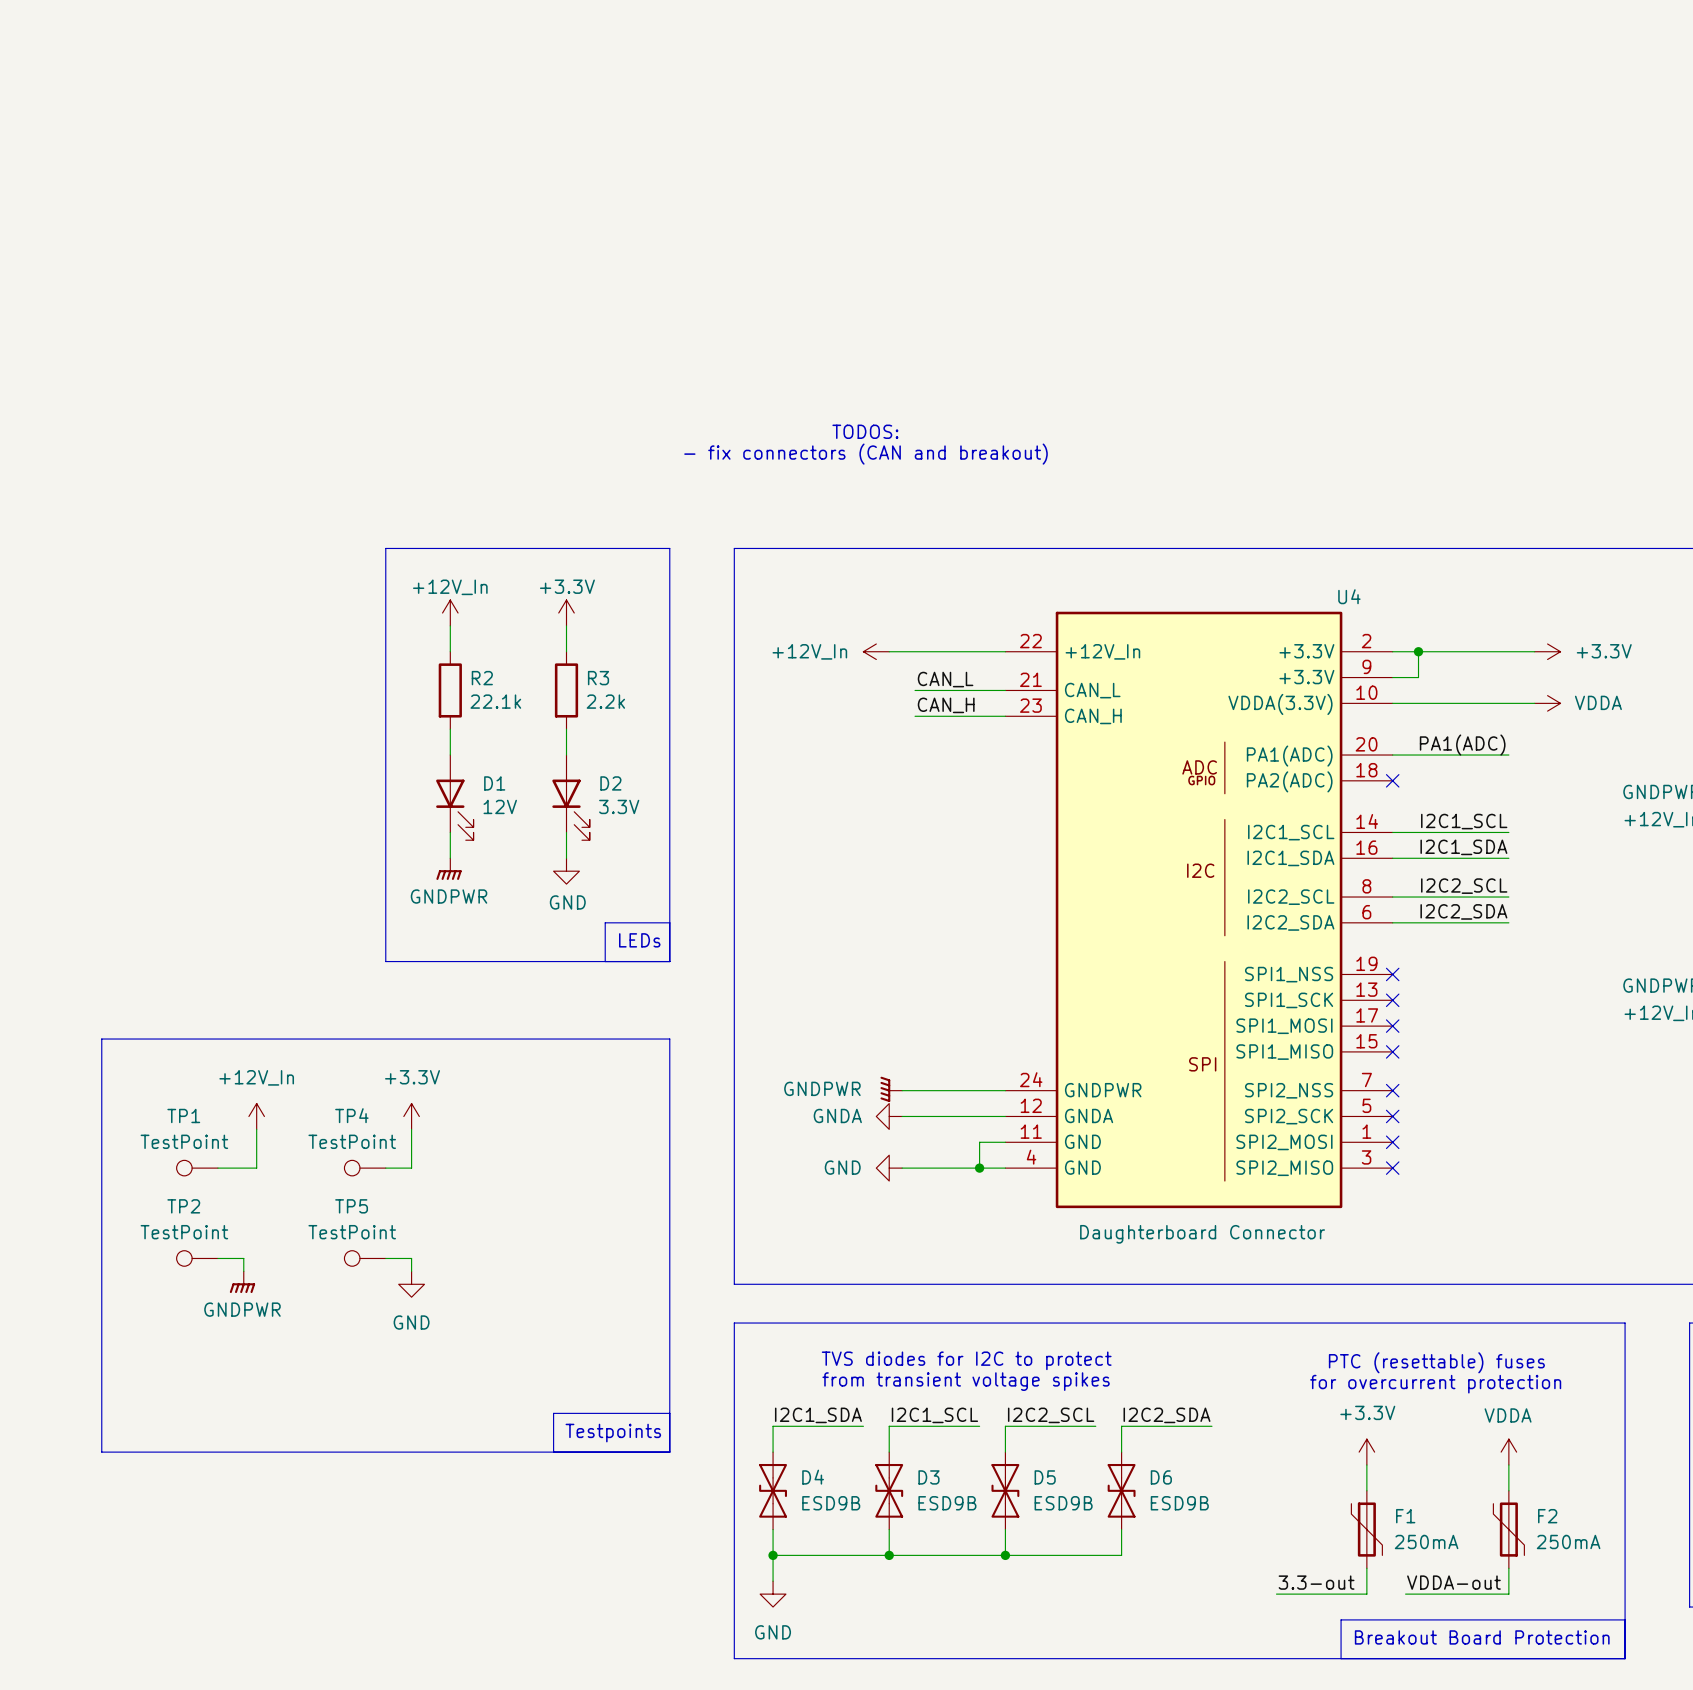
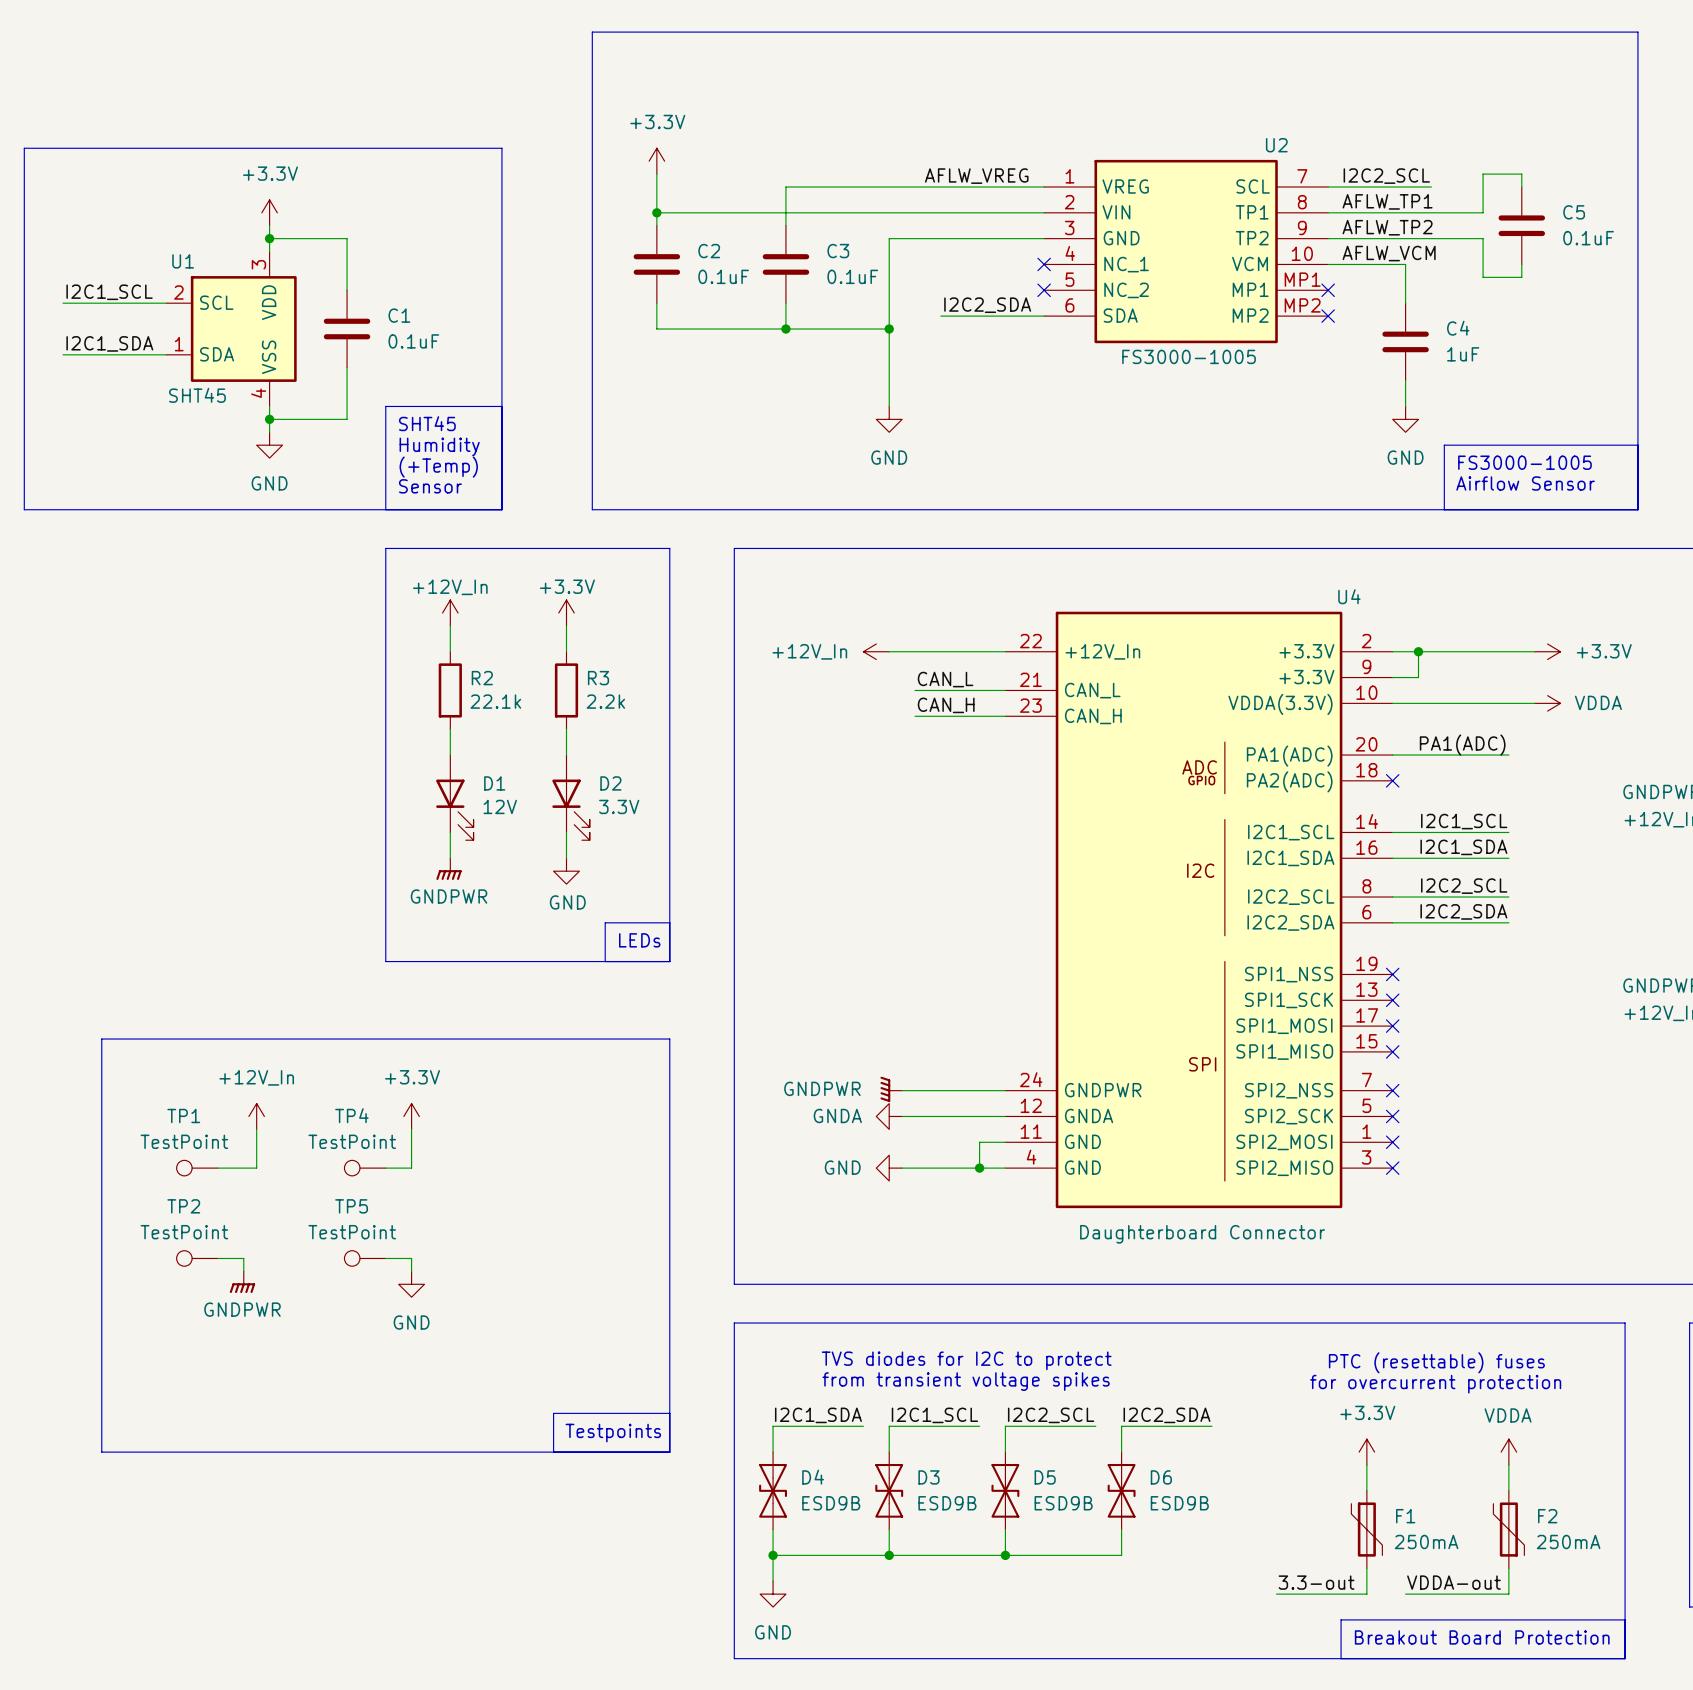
line: none -> (592, 32) (1637, 32) (1637, 509) (592, 509) (592, 32)
line: none -> (24, 148) (501, 148) (501, 509) (24, 509) (24, 148)
power symbol: none -> +3.3V (656, 161)
wire: none -> (656, 174) (656, 225)
label: none -> AFLW_VREG (976, 176)
label: none -> I2C2_SCL (1386, 176)
wire: none -> (1044, 187) (785, 187) (785, 225)
wire: none -> (1328, 187) (1431, 187)
wire: none -> (1521, 187) (1521, 174) (1483, 174) (1483, 212) (1328, 212)
label: none -> AFLW_TP1 (1387, 201)
power symbol: none -> +3.3V (269, 212)
wire: none -> (656, 212) (1044, 212)
junction: none -> (656, 212)
wire: none -> (269, 225) (269, 251)
C5: none -> 0.1uF (1521, 225)
label: none -> AFLW_TP2 (1387, 227)
wire: none -> (269, 238) (347, 238) (347, 290)
junction: none -> (269, 238)
wire: none -> (1044, 238) (889, 238) (889, 406)
wire: none -> (1328, 238) (1483, 238) (1483, 277) (1521, 277) (1521, 264)
U2: none -> FS3000-1005 (1186, 251)
label: none -> AFLW_VCM (1389, 253)
C2: none -> 0.1uF (656, 264)
C3: none -> 0.1uF (785, 264)
no-connect mark: none -> (1044, 264)
wire: none -> (1328, 264) (1405, 264) (1405, 303)
no-connect mark: none -> (1044, 290)
no-connect mark: none -> (1328, 290)
label: none -> I2C1_SCL (109, 292)
wire: none -> (63, 303) (166, 303)
wire: none -> (656, 303) (656, 329) (889, 329)
wire: none -> (785, 303) (785, 329)
label: none -> I2C2_SDA (987, 305)
wire: none -> (940, 316) (1044, 316)
no-connect mark: none -> (1328, 316)
U1: none -> SHT45 (231, 329)
C1: none -> 0.1uF (347, 329)
junction: none -> (785, 329)
junction: none -> (889, 329)
C4: none -> 1uF (1405, 341)
label: none -> I2C1_SDA (109, 343)
wire: none -> (63, 354) (166, 354)
wire: none -> (347, 367) (347, 419) (269, 419)
wire: none -> (1405, 380) (1405, 406)
wire: none -> (269, 406) (269, 432)
line: none -> (501, 406) (385, 406) (385, 509)
junction: none -> (269, 419)
power symbol: none -> GND (889, 419)
power symbol: none -> GND (1405, 419)
text: none -> SHT45 (427, 423)
text: TODOS: (865, 431) -> none
power symbol: none -> GND (269, 445)
line: none -> (1637, 445) (1444, 445) (1444, 509)
text: none -> Humidity (439, 446)
text: - fix connectors (CAN and breakout) (865, 454) -> none
text: none -> FS3000-1005 (1524, 462)
text: none -> (+Temp) (438, 467)
text: none -> Airflow Sensor (1525, 483)
text: none -> Sensor (430, 486)

